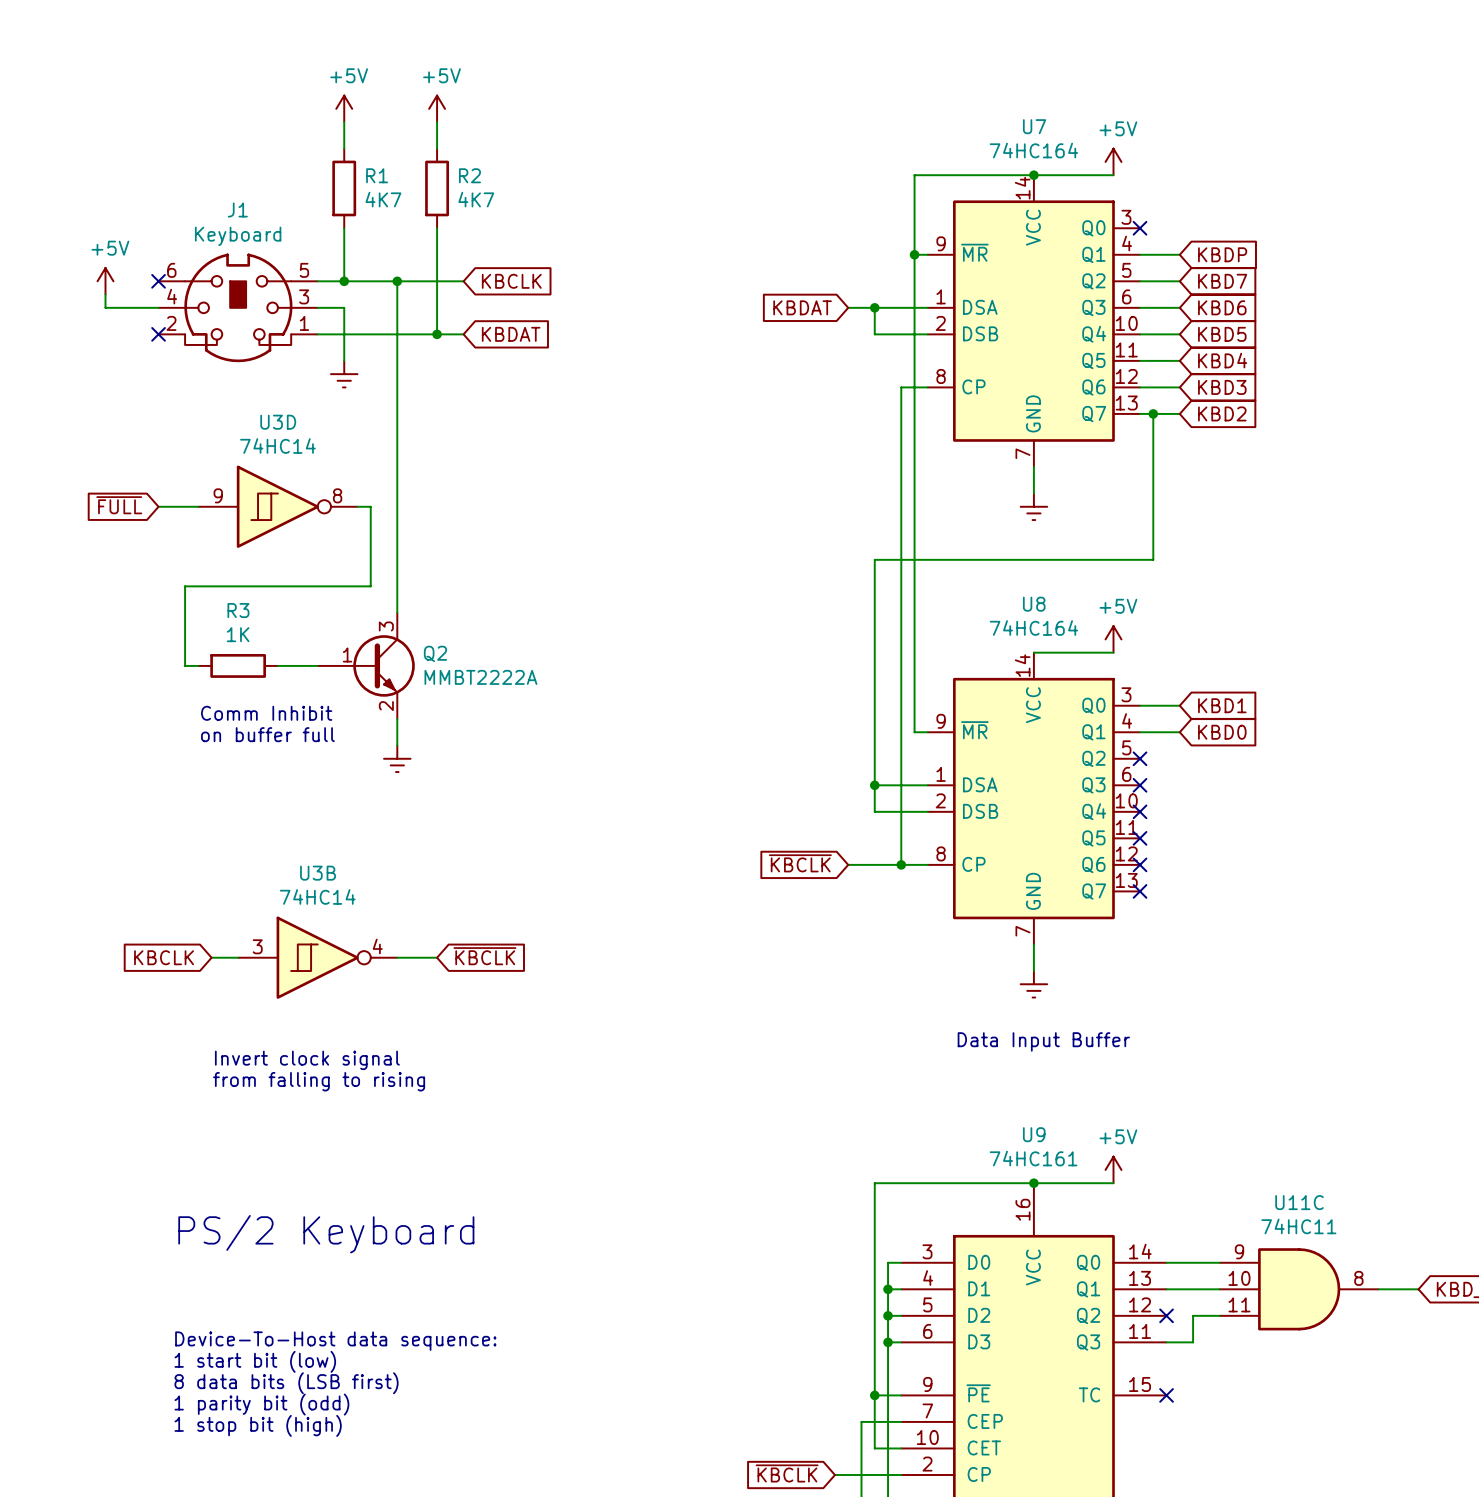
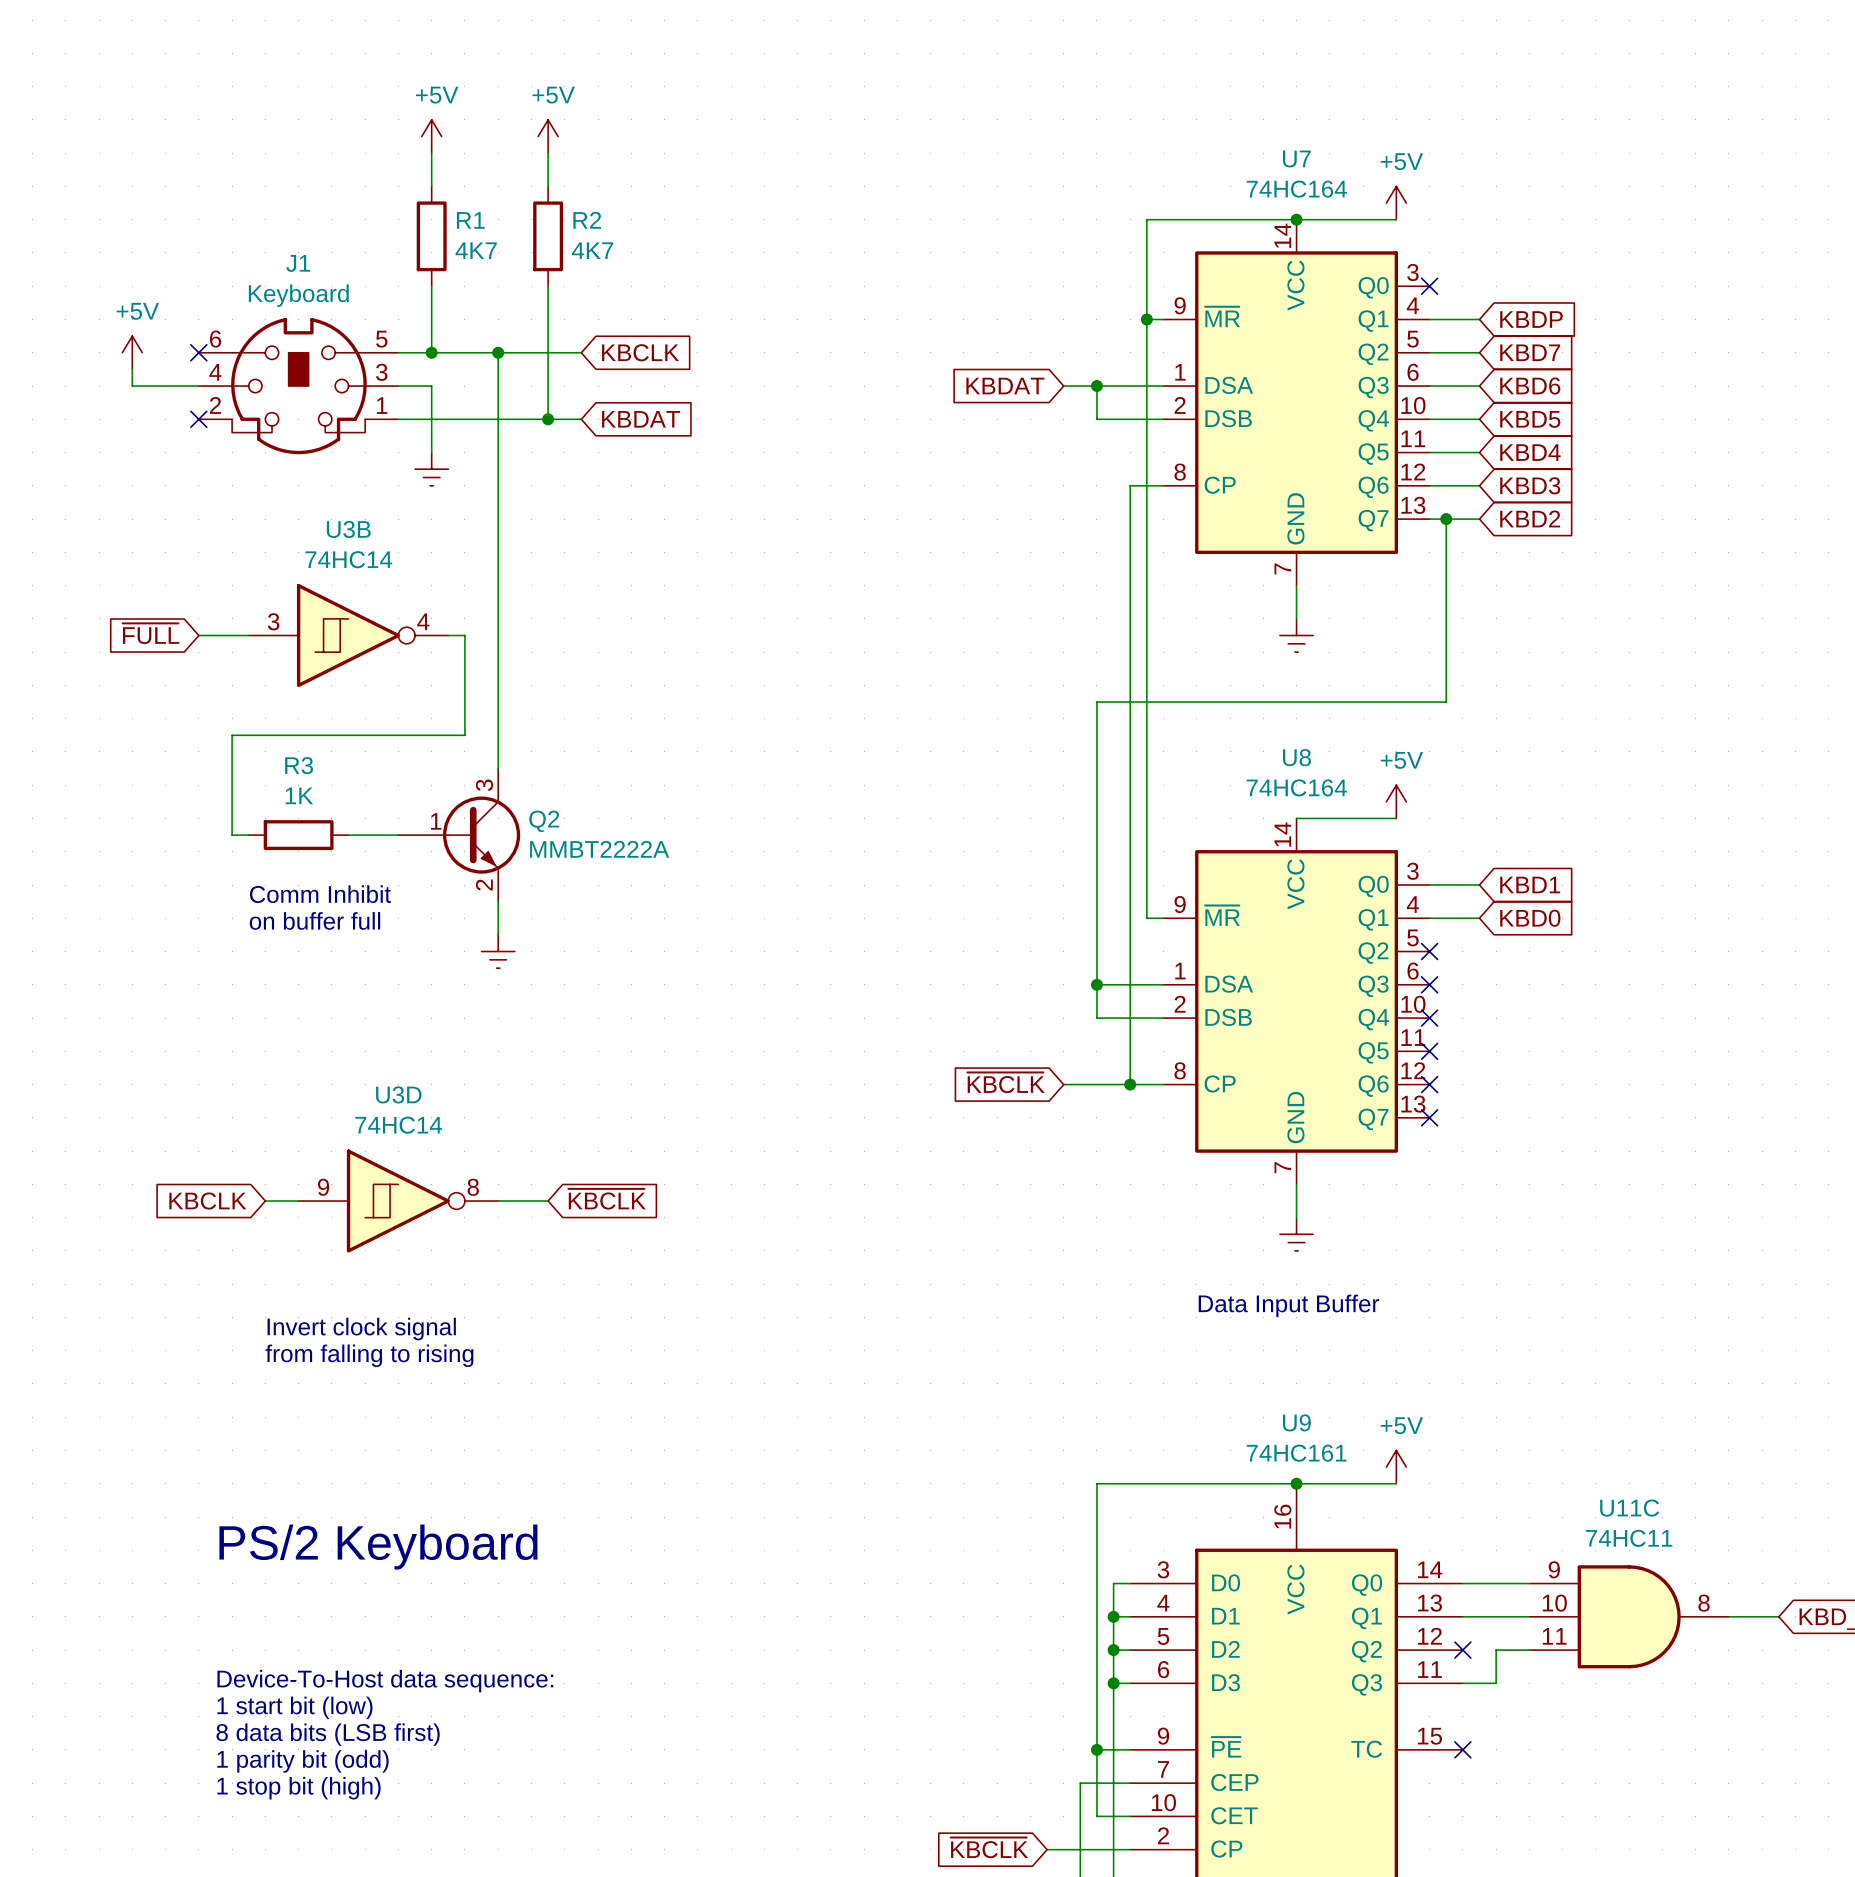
U3D position: (277, 506) -> (398, 1201)
U3B position: (317, 957) -> (348, 635)

